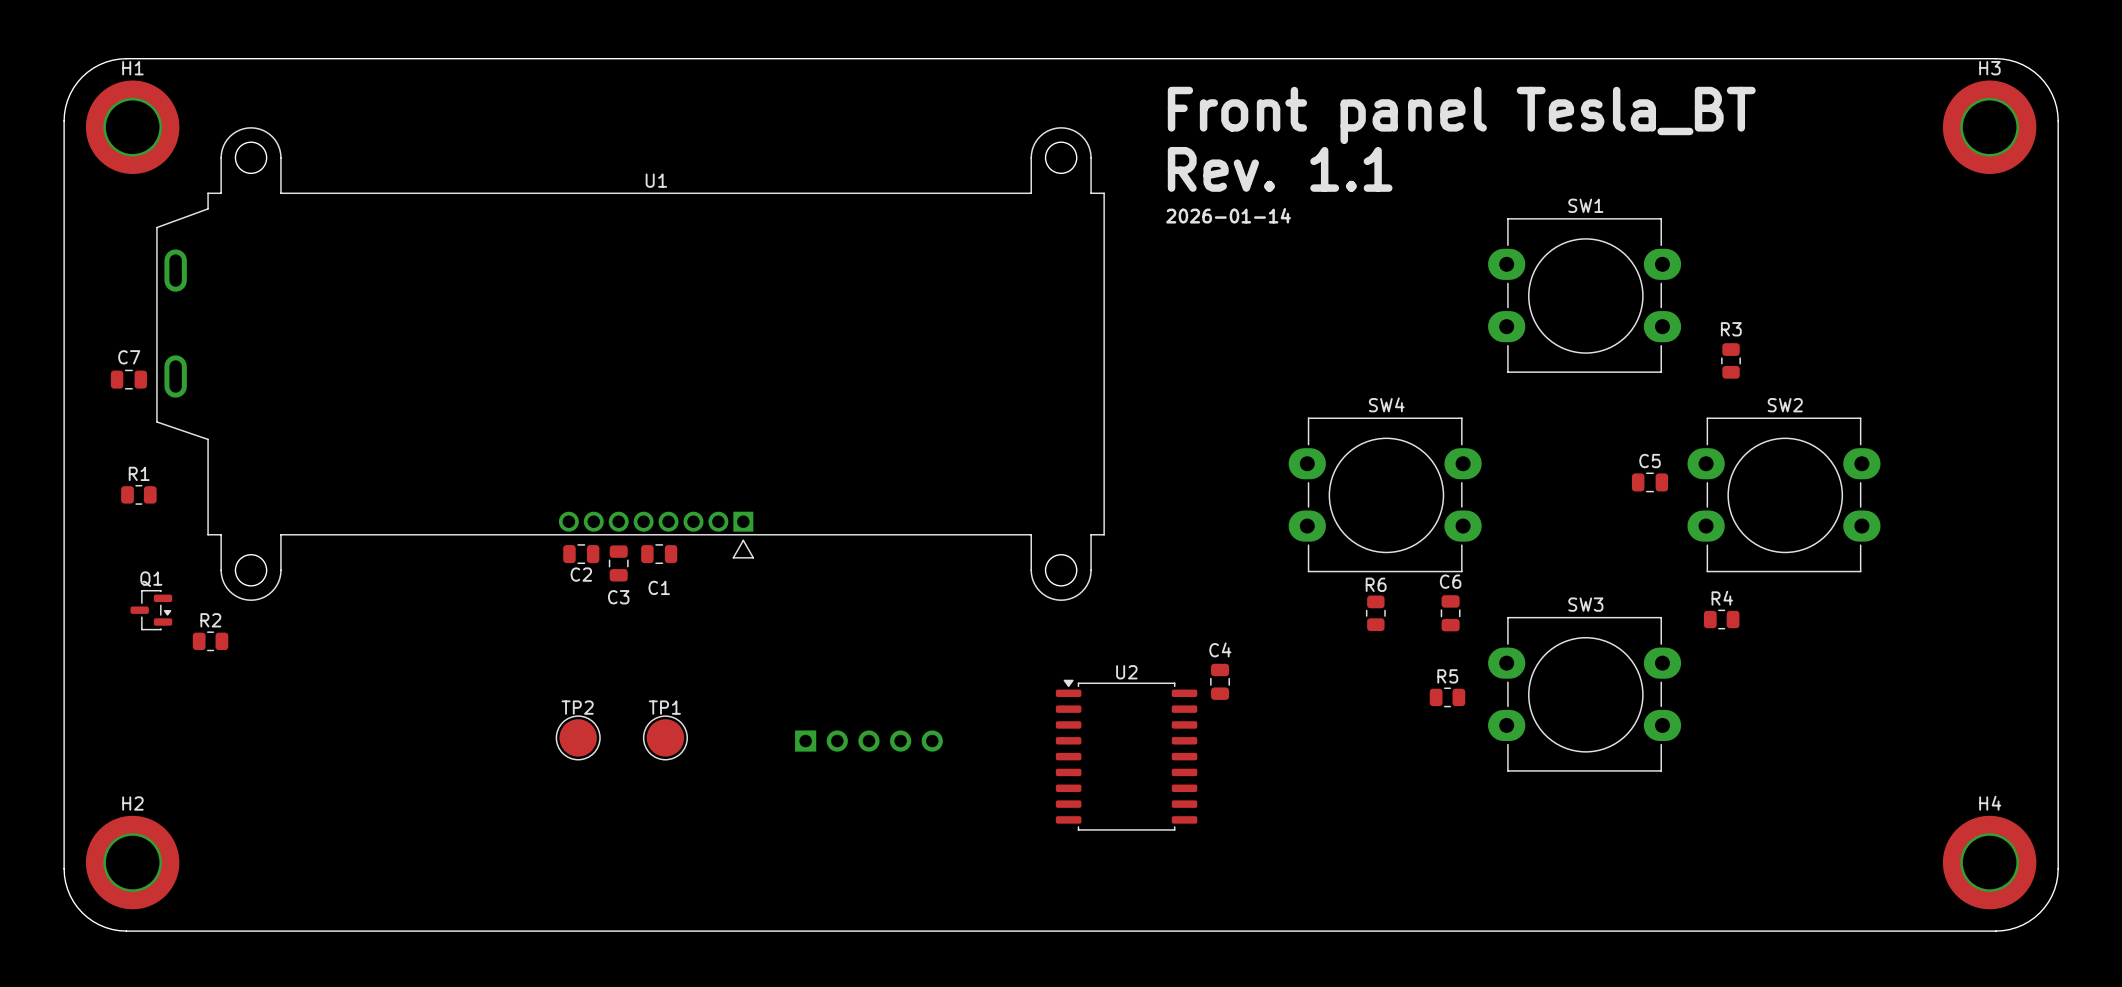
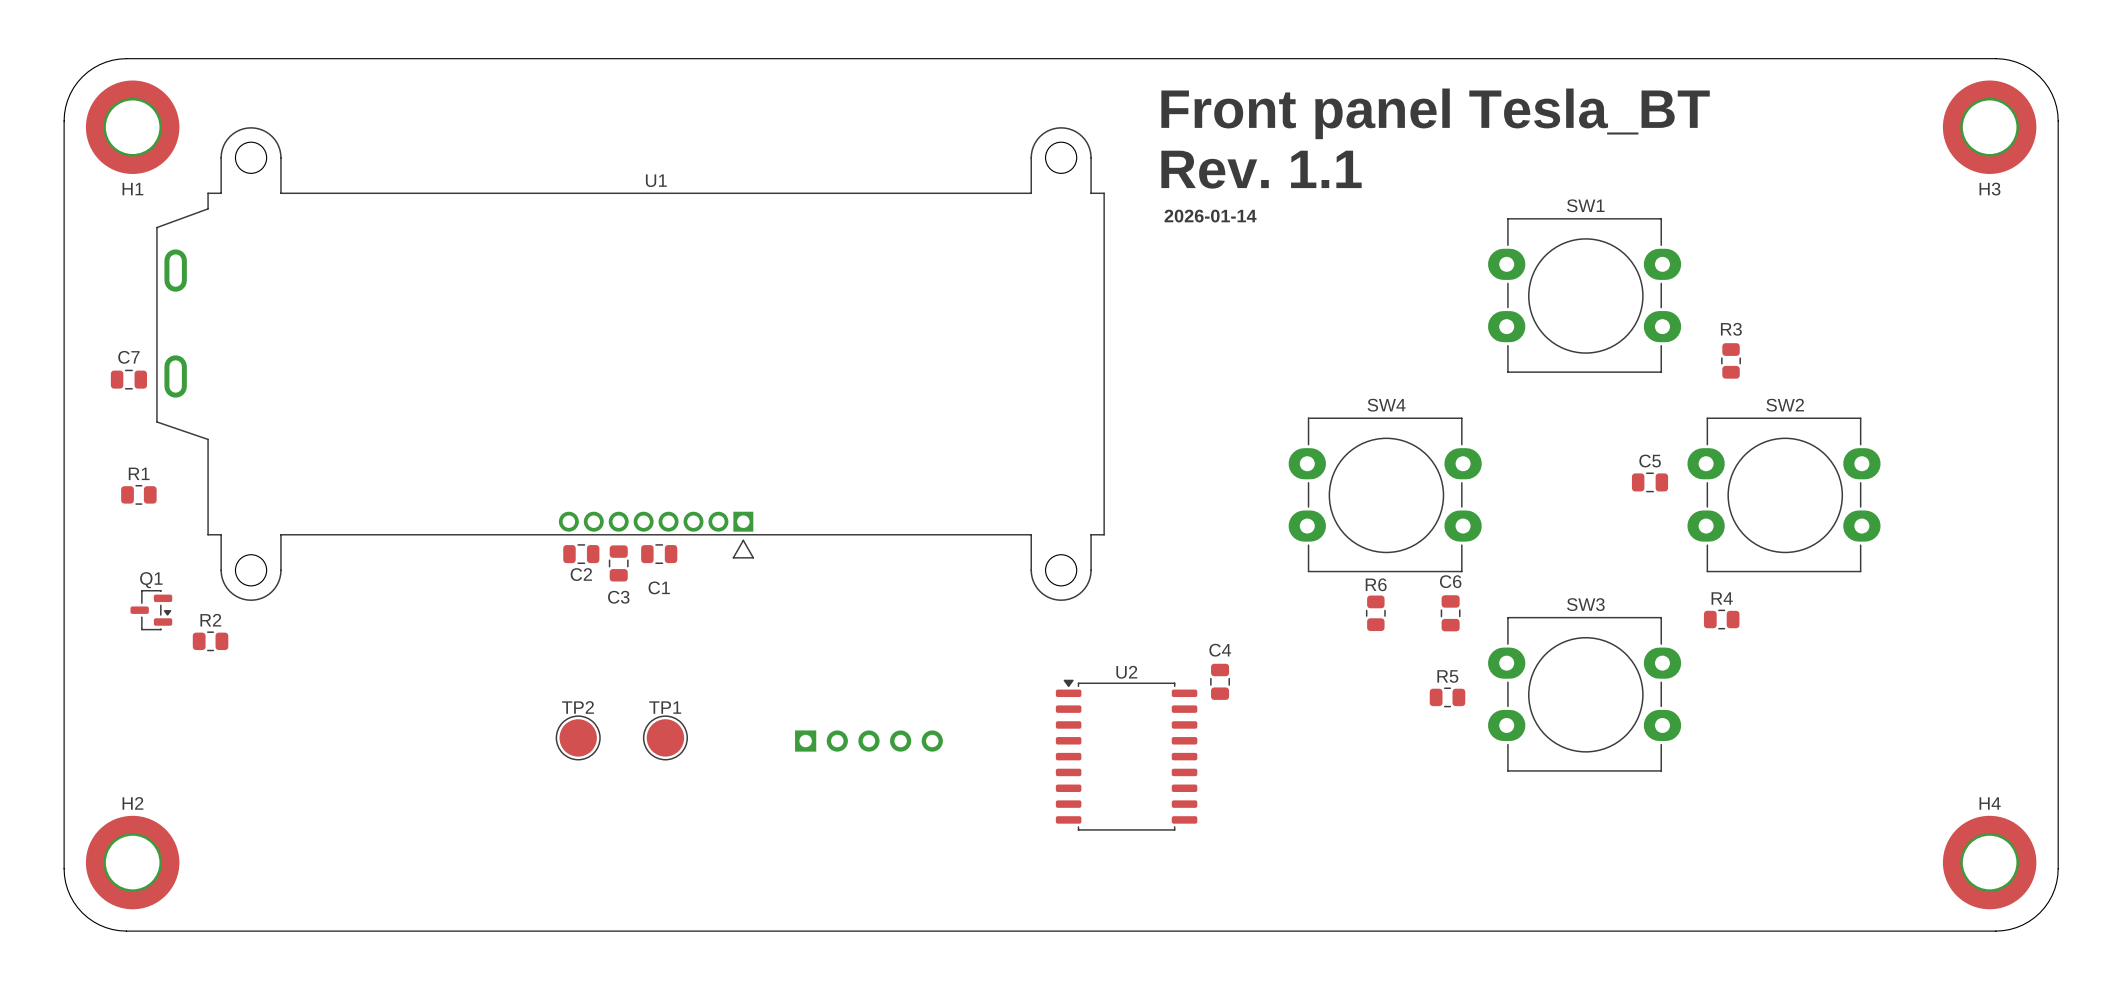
H1 name position: H1 (132, 68) -> H1 (132, 189)
H3 name position: H3 (1989, 68) -> H3 (1989, 189)

